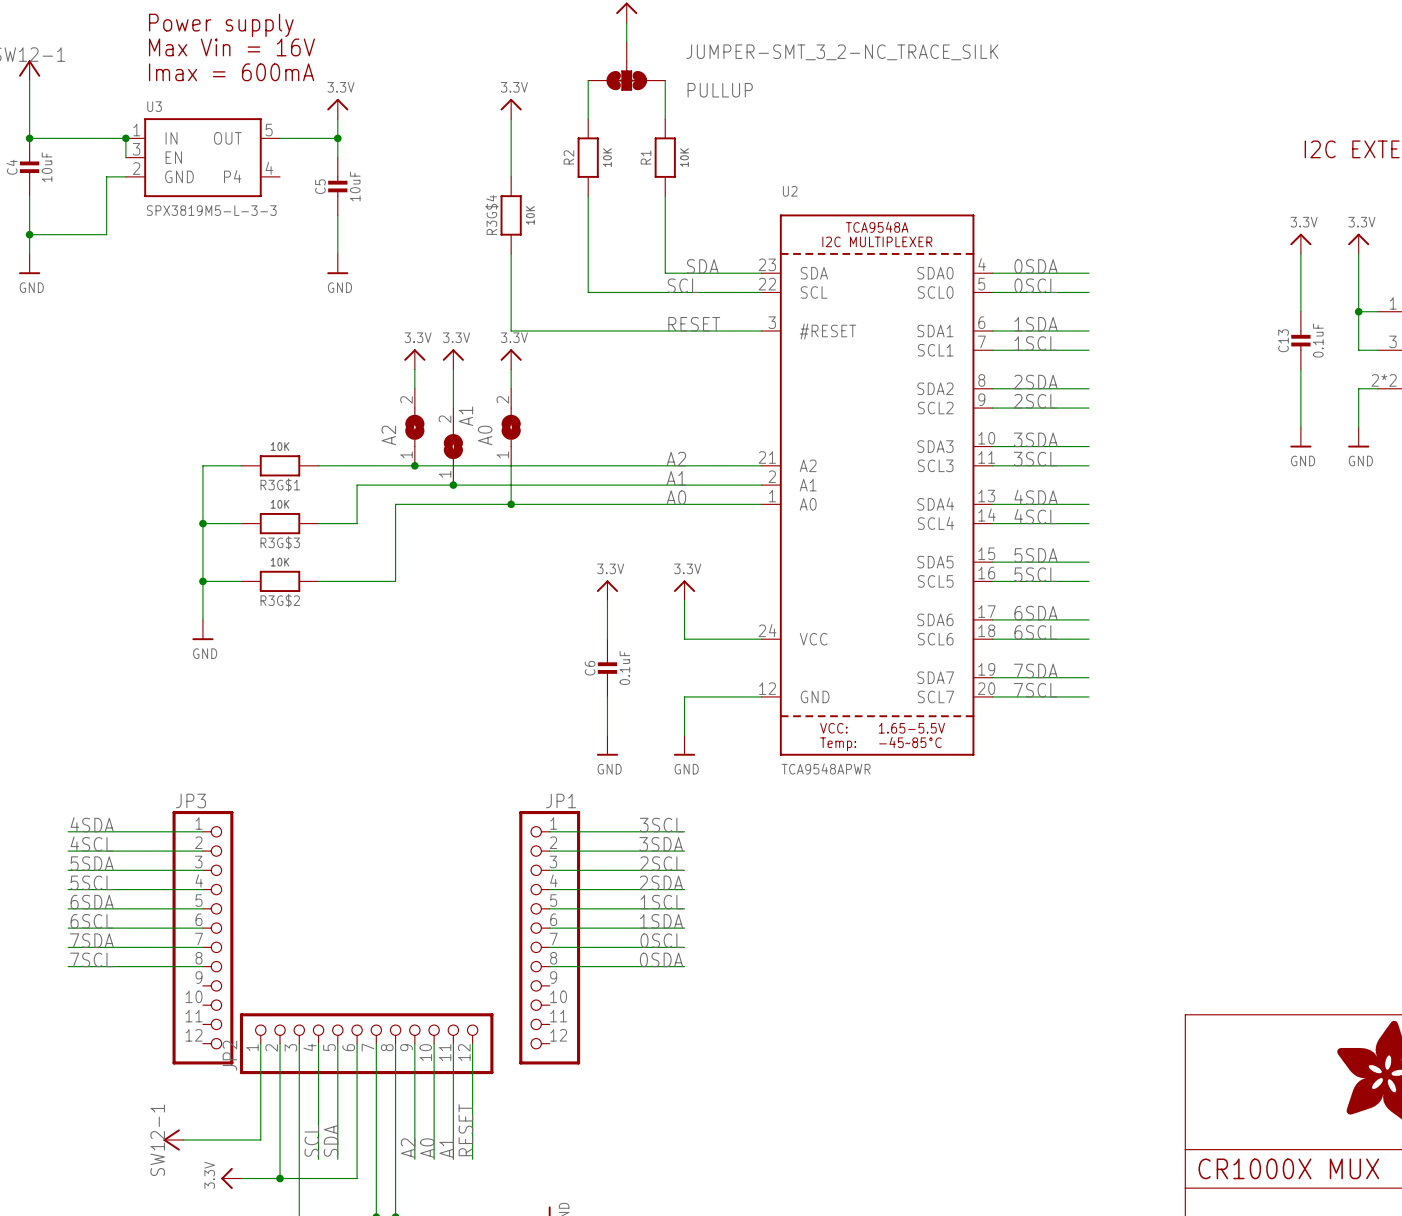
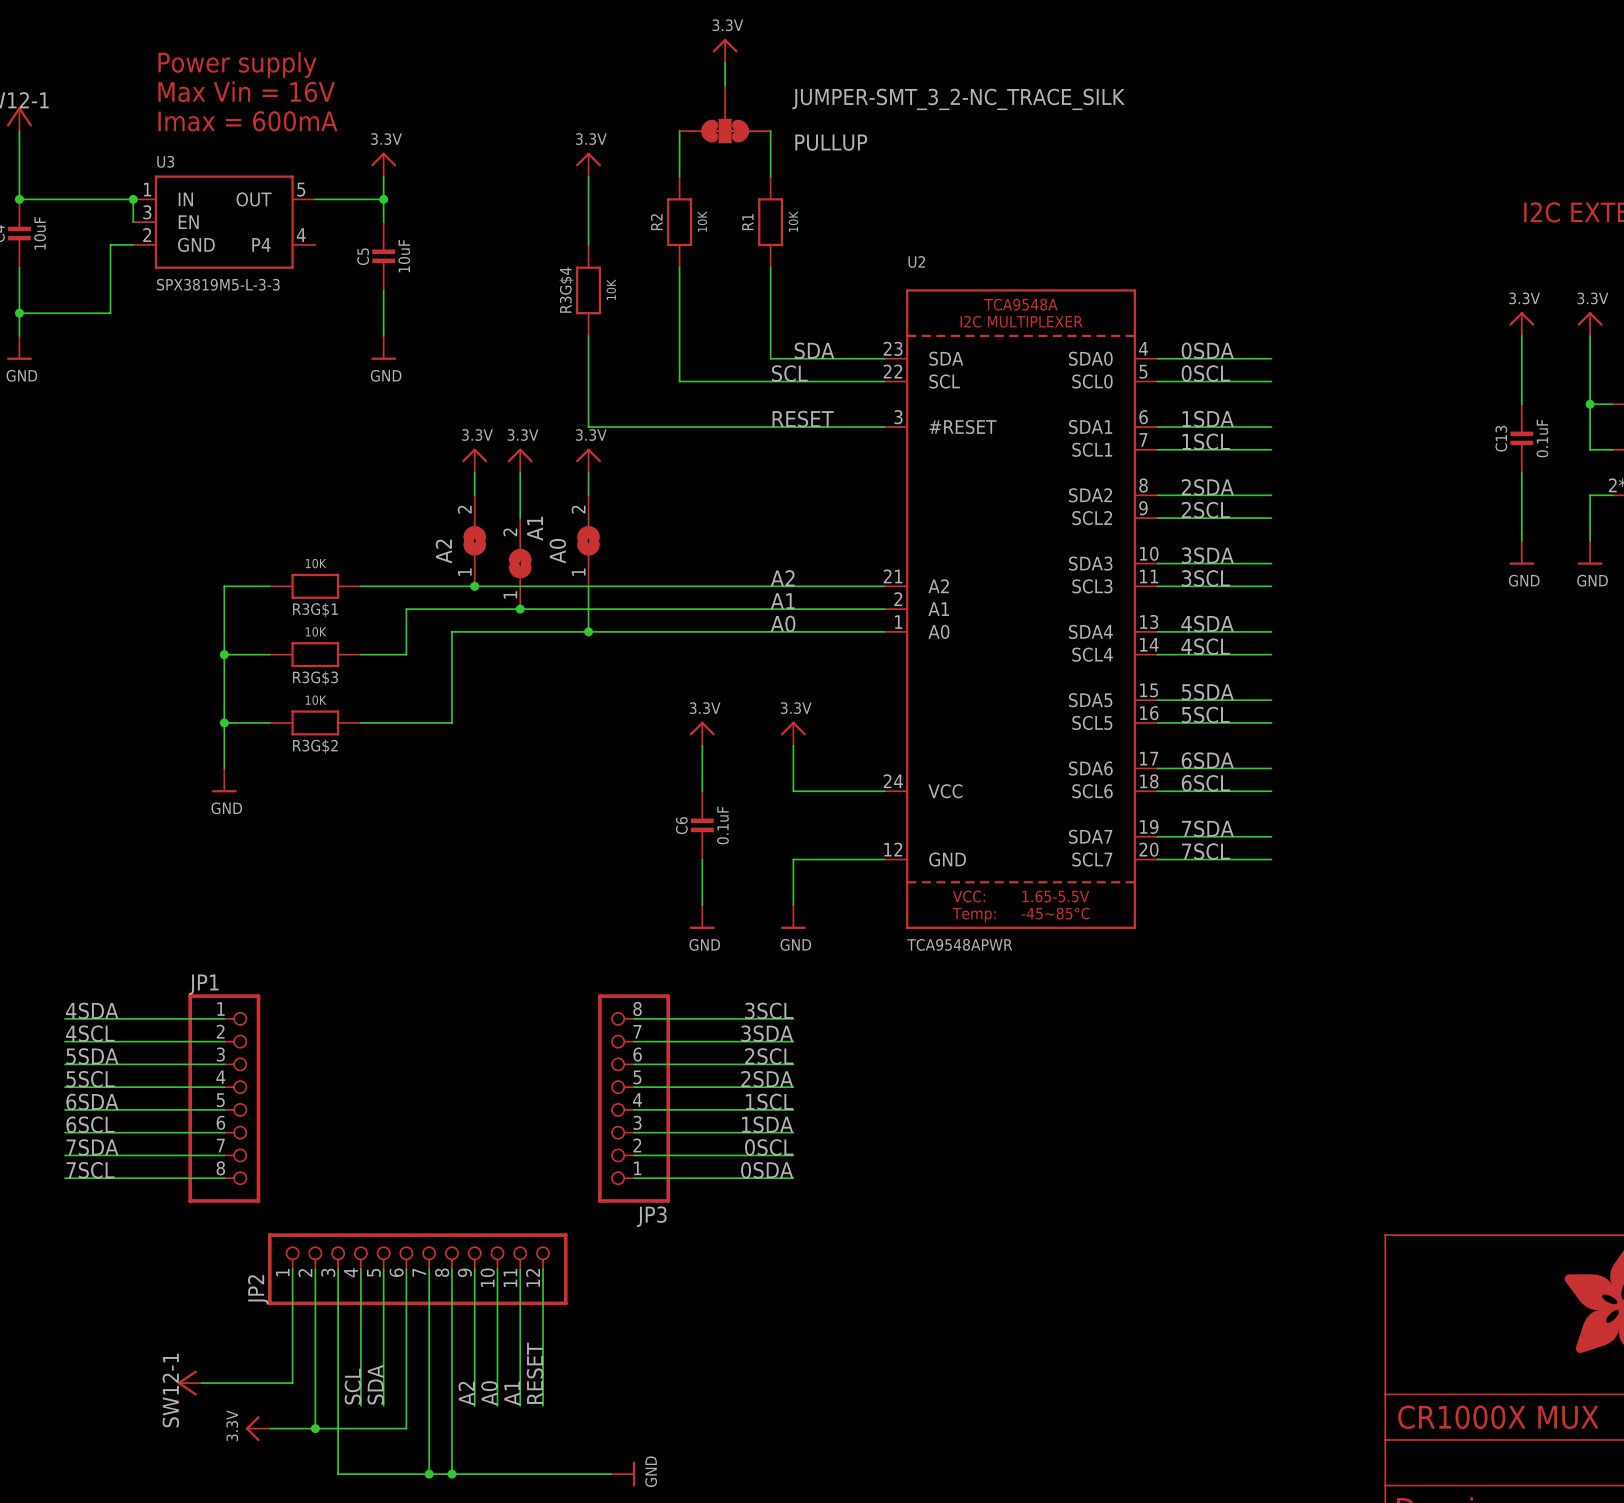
JP3 name position: JP3 (190, 800) -> JP3 (651, 1216)
JP1 name position: JP1 (561, 800) -> JP1 (203, 984)
JP3 symbol: [172, 811, 234, 1065] -> [598, 994, 671, 1203]
JP1 symbol: [519, 811, 581, 1065] -> [188, 994, 261, 1203]

